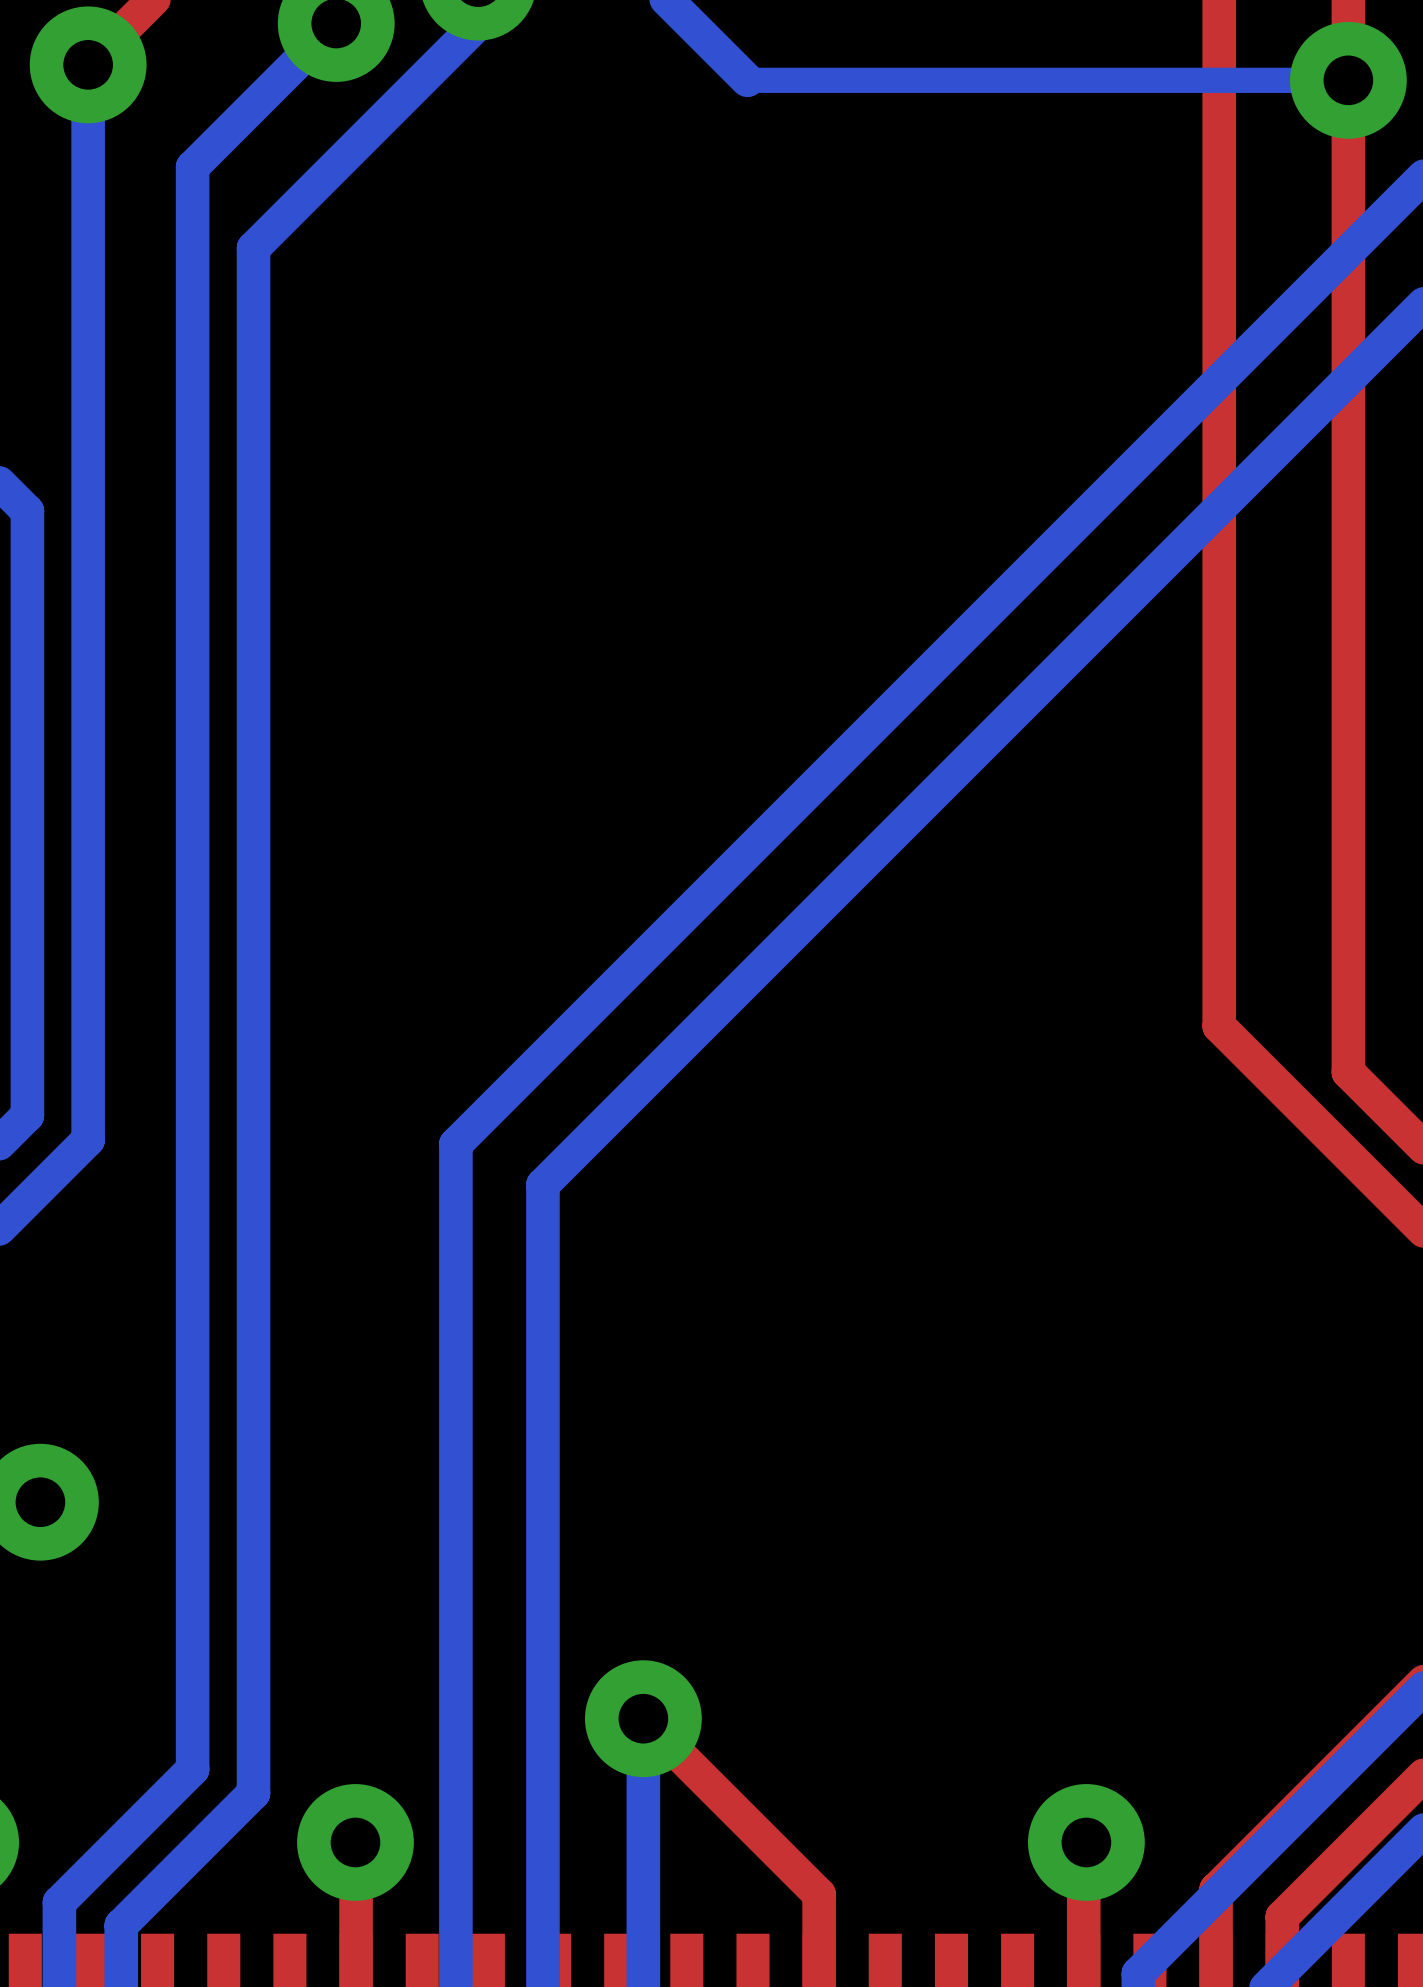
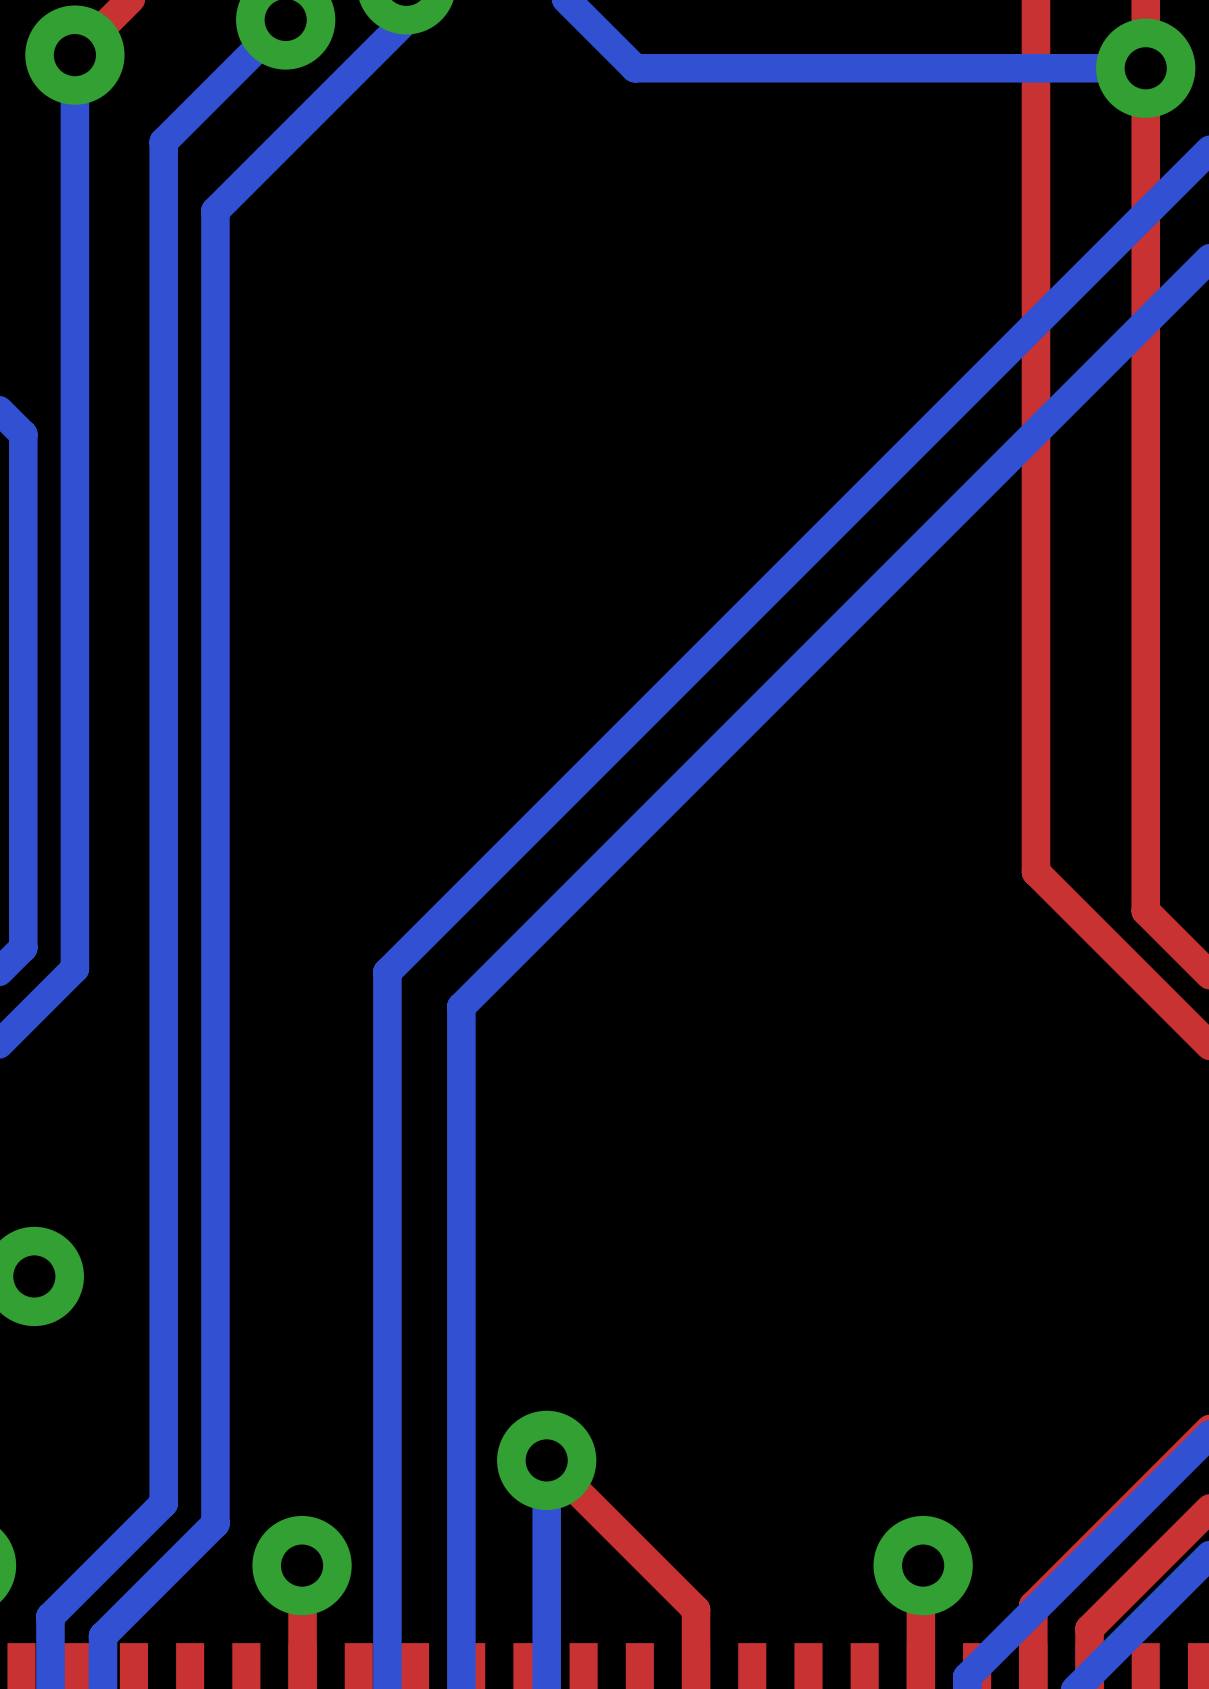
bottom track width: thin (1348, 80) (747, 80) -> thick (1145, 68) (635, 68)

